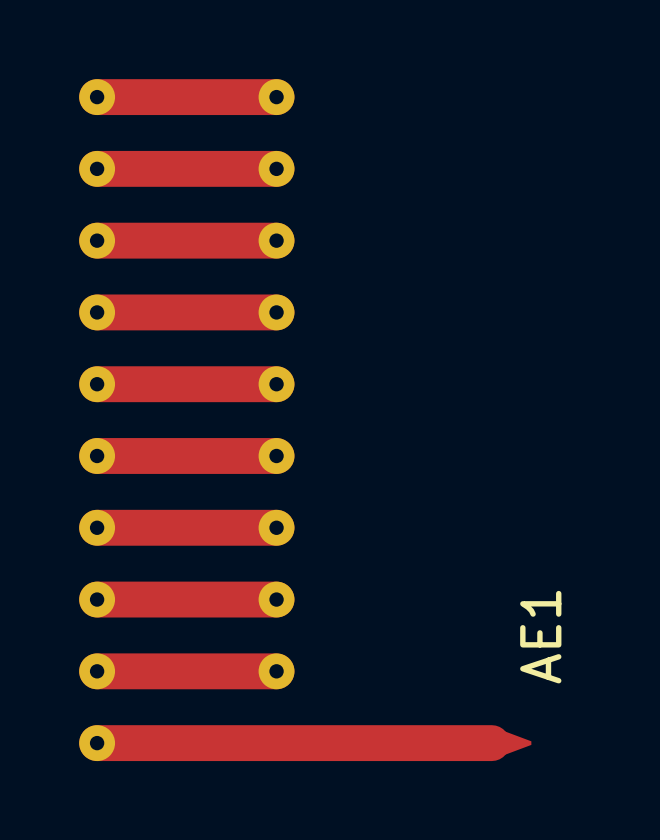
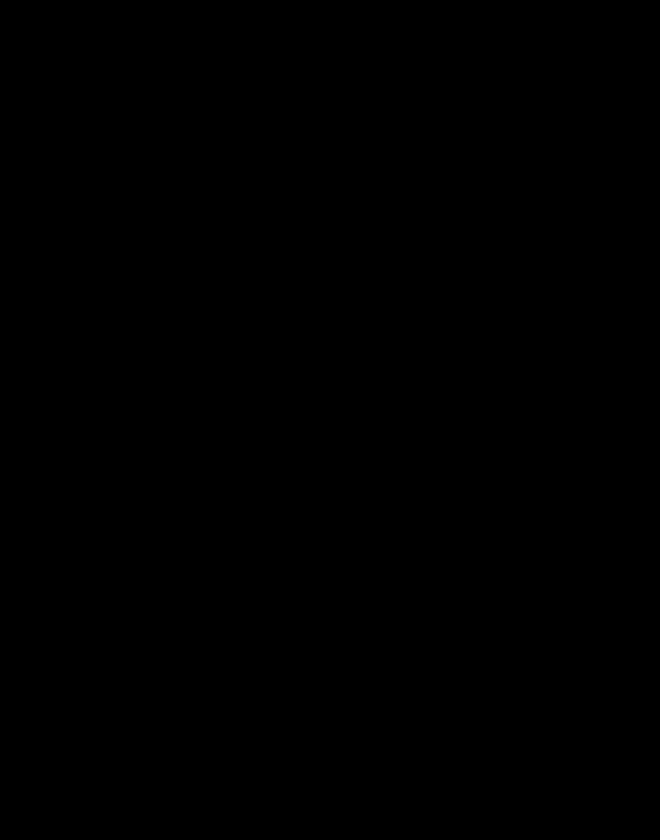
AE1: (305, 420) -> none

